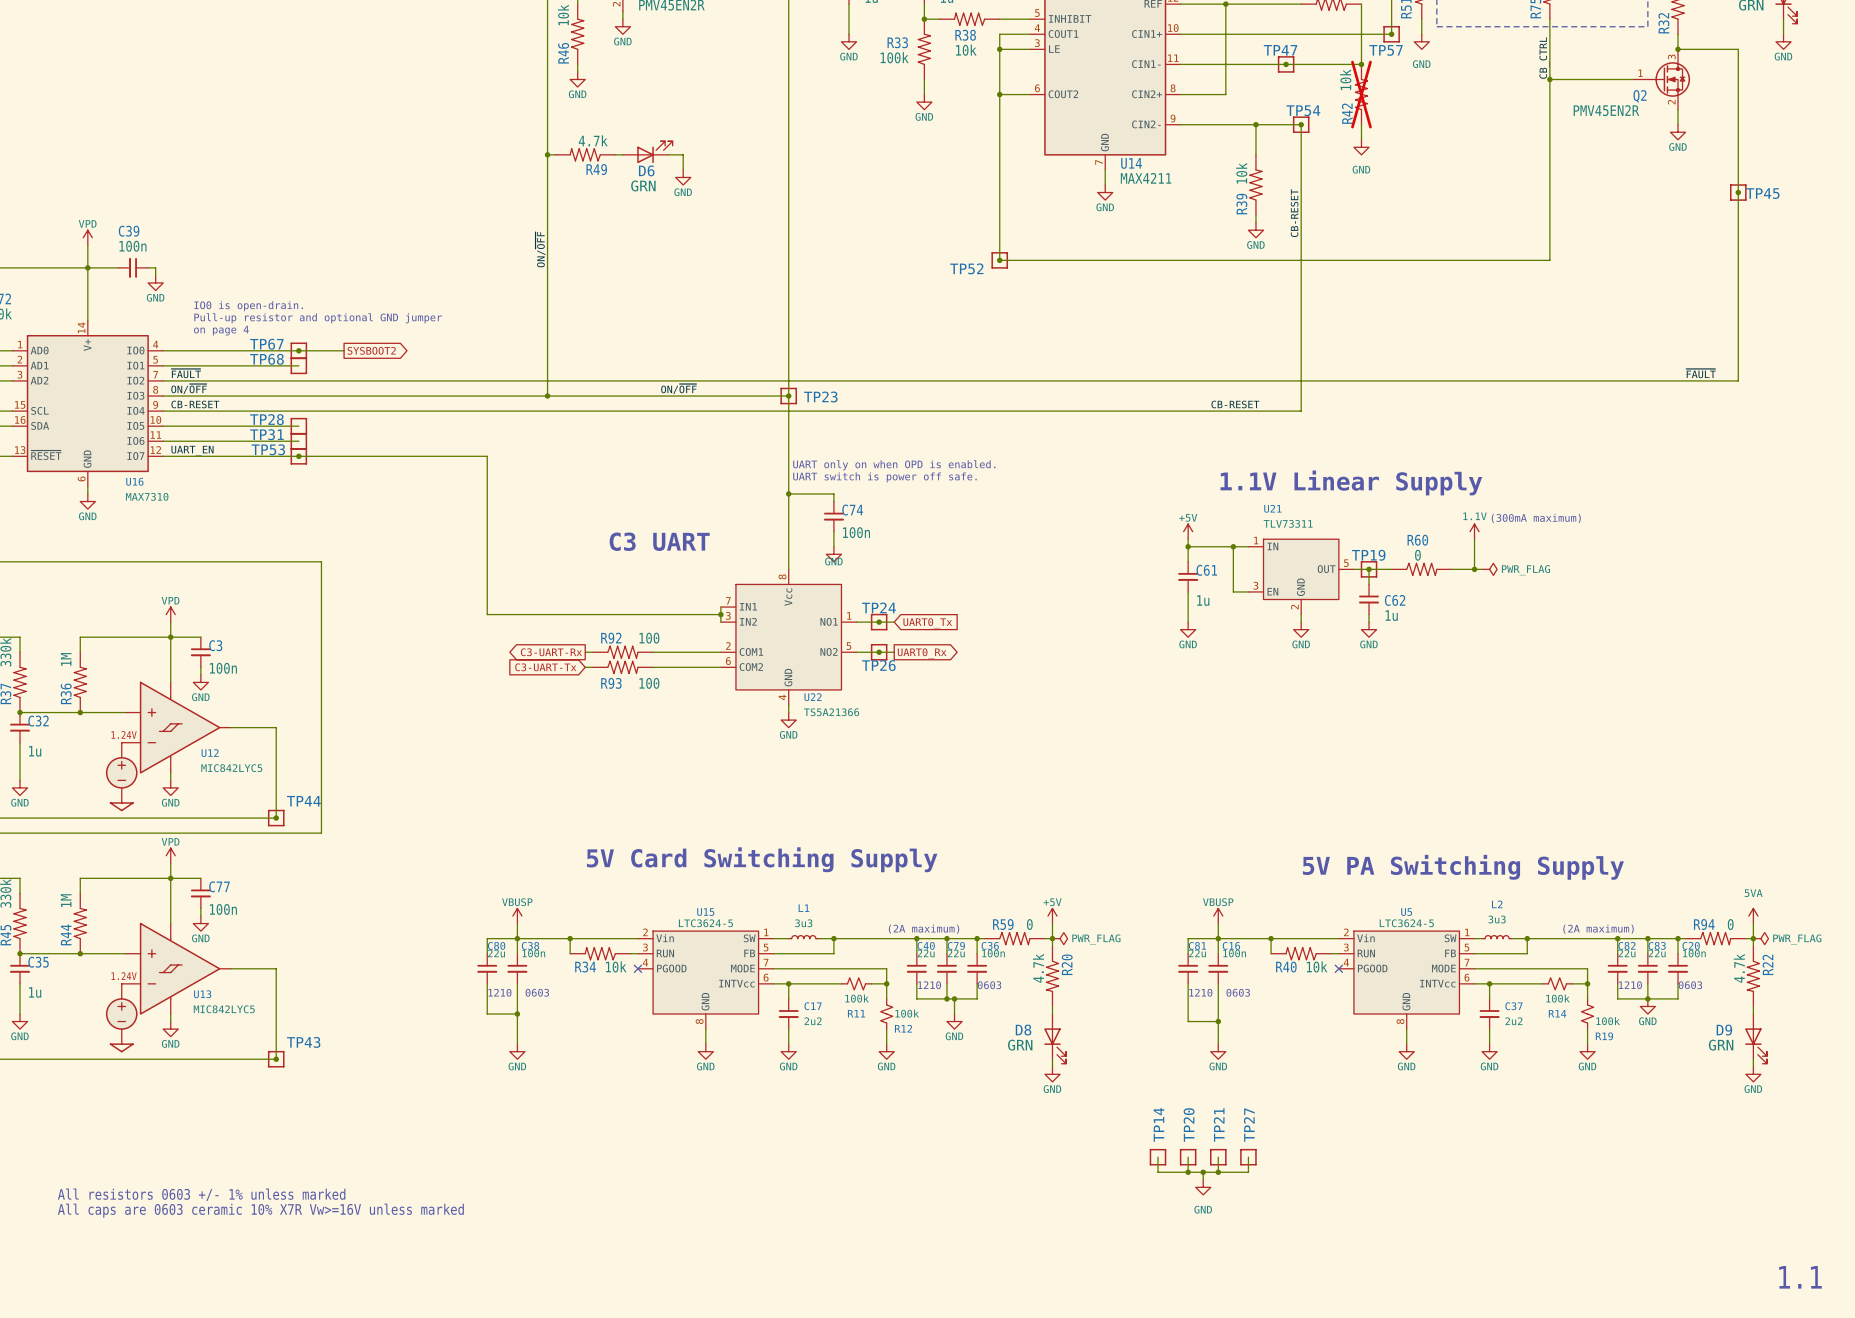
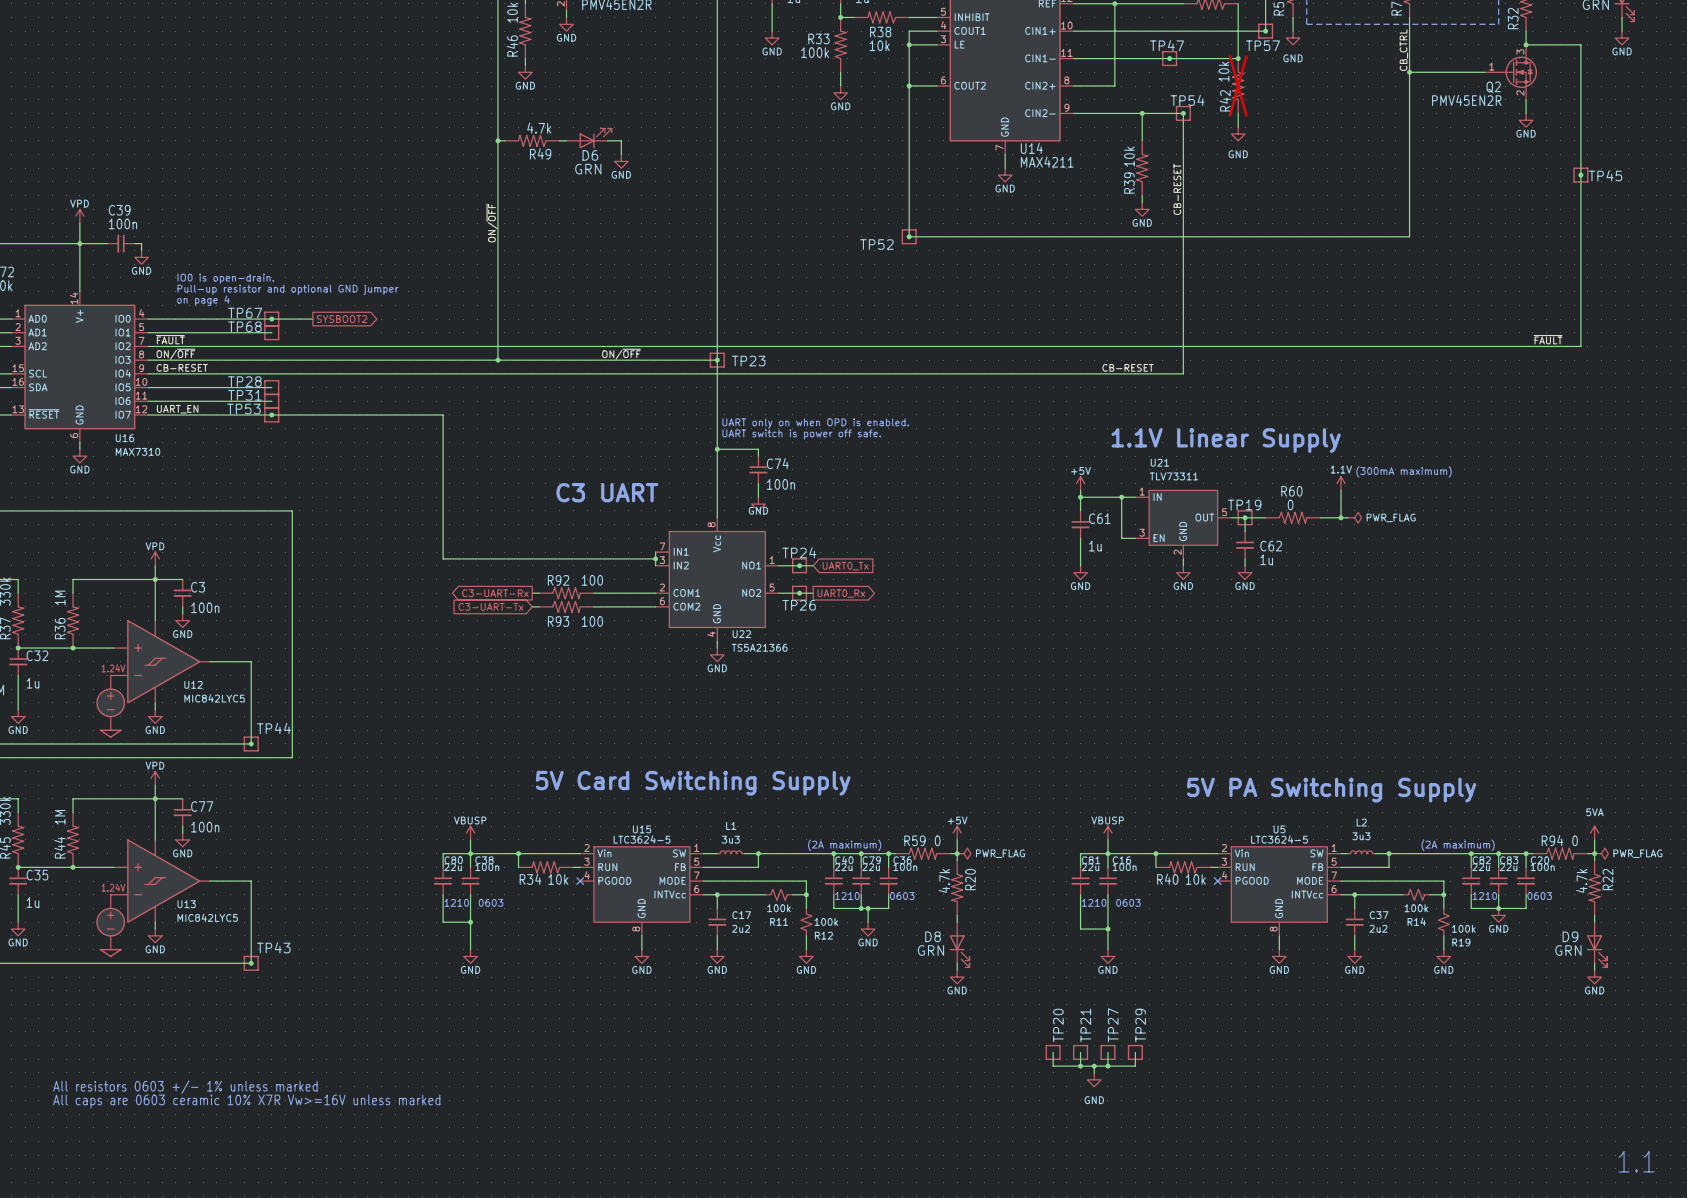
TP14 name: TP14 (1158, 1124) -> TP20 (1058, 1025)
TP20 name: TP20 (1189, 1125) -> TP21 (1085, 1025)
TP21 name: TP21 (1219, 1125) -> TP27 (1113, 1025)
TP27 name: TP27 (1249, 1125) -> TP29 (1140, 1025)

